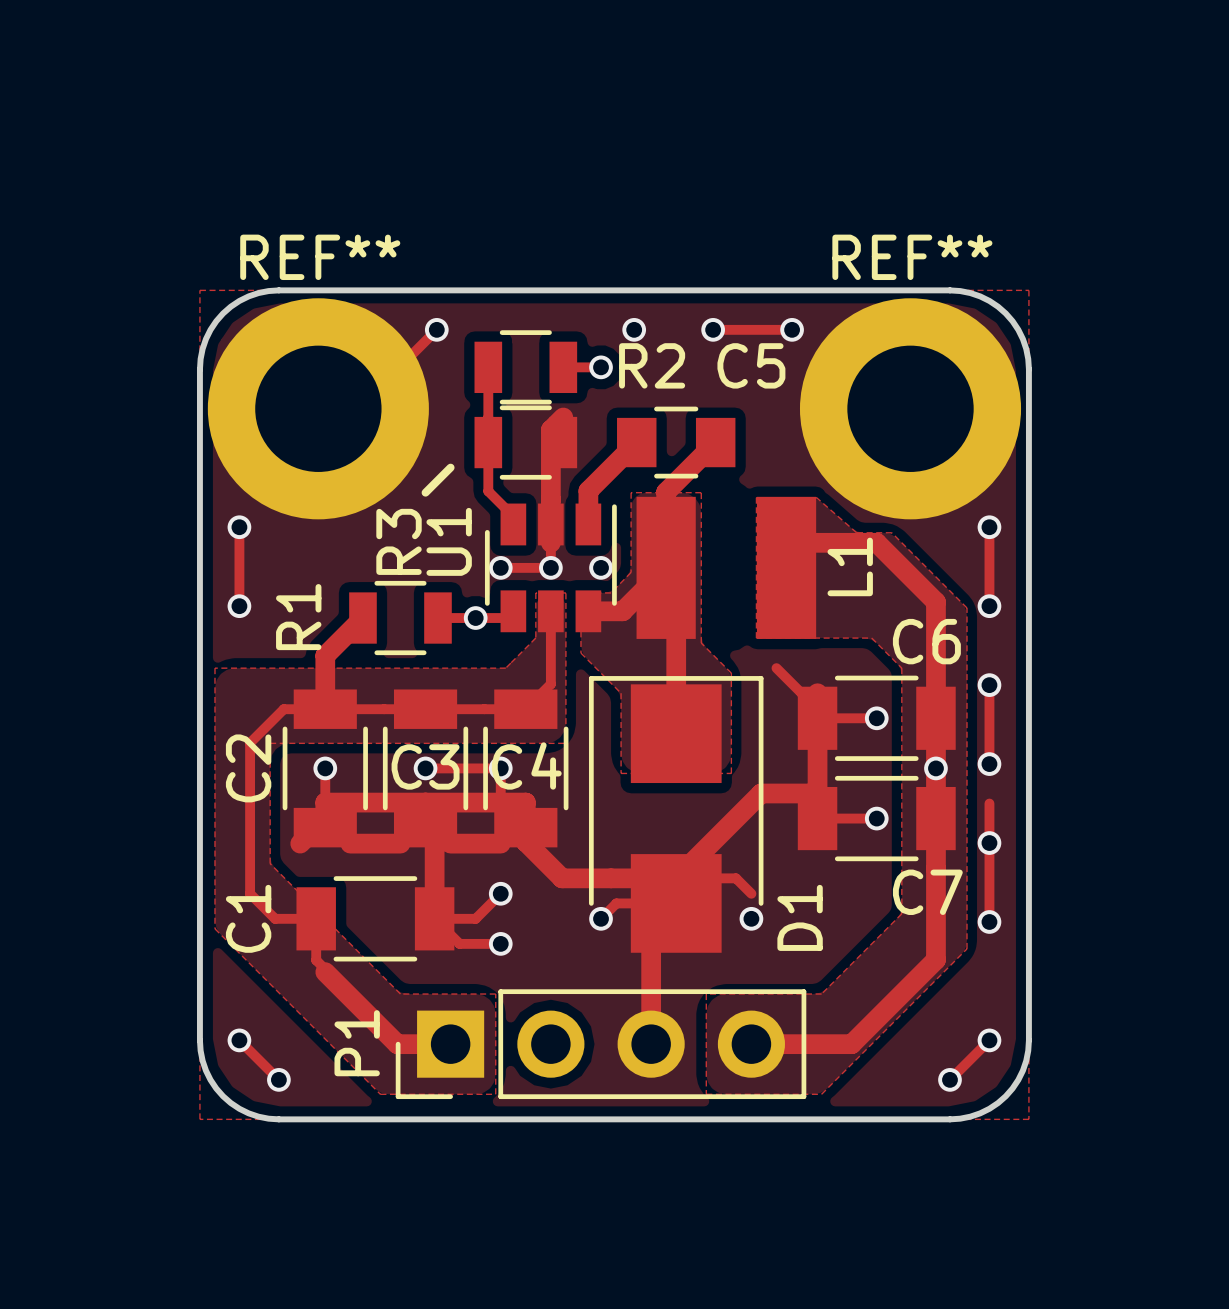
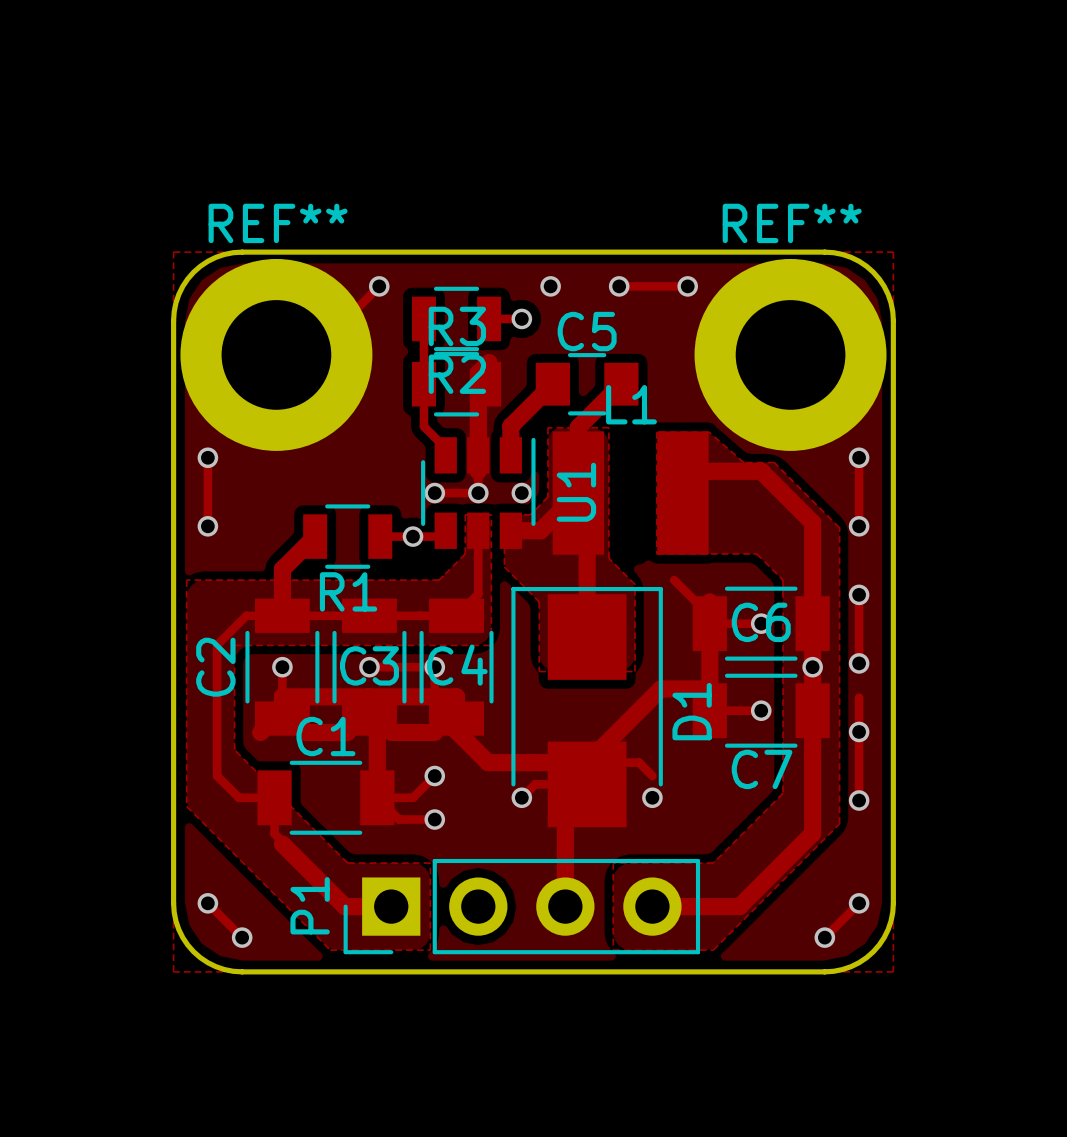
R2 name position: R2 (652, 365) -> R2 (457, 374)
C5 name position: C5 (751, 365) -> C5 (587, 331)
line: (450, 467) (425, 492) -> none
R3 name rotation: 0° (399, 541) -> 90° clockwise (457, 326)
R3 name position: R3 (399, 541) -> R3 (457, 326)
U1 name position: U1 (449, 541) -> U1 (576, 492)
L1 name rotation: 0° (850, 566) -> 90° clockwise (631, 404)
L1 name position: L1 (850, 566) -> L1 (631, 404)
R1 name rotation: 0° (298, 617) -> 90° clockwise (348, 591)
R1 name position: R1 (298, 617) -> R1 (348, 591)
C6 name position: C6 (926, 641) -> C6 (761, 622)
C7 name position: C7 (927, 892) -> C7 (762, 769)
D1 name position: D1 (800, 917) -> D1 (692, 711)
C1 name rotation: 0° (248, 918) -> 90° clockwise (325, 736)
C1 name position: C1 (248, 918) -> C1 (325, 736)

